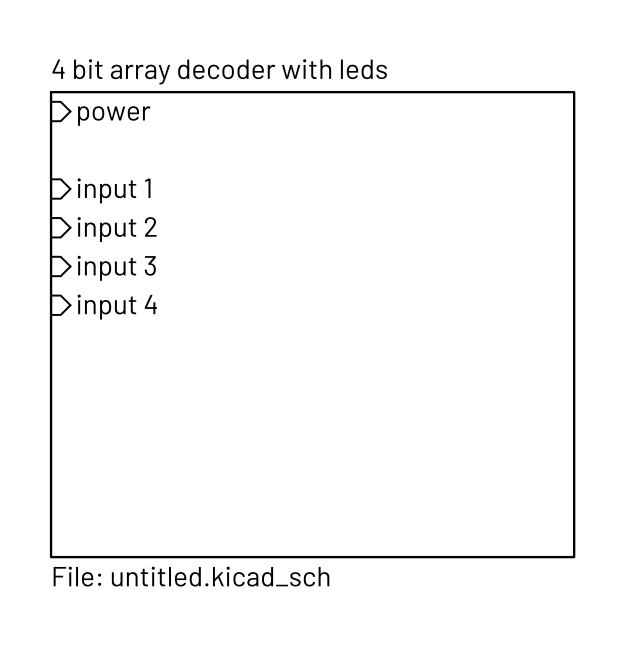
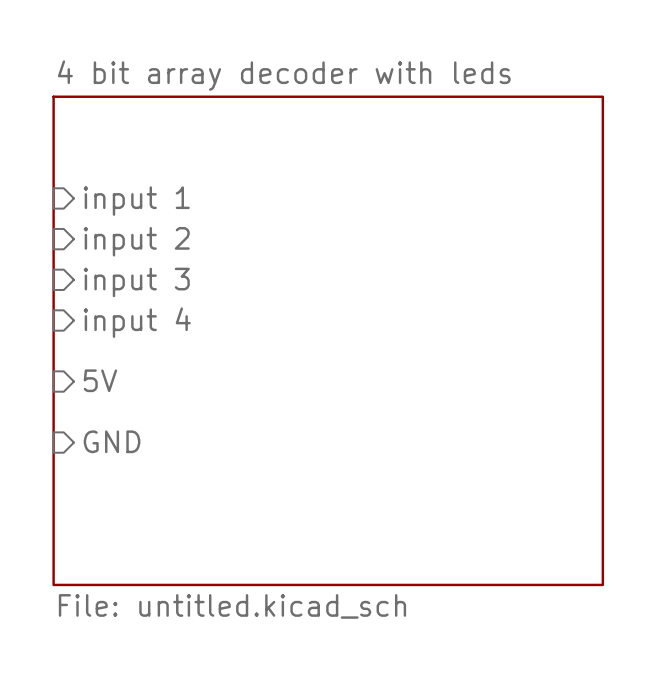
sheet pin: power (114, 116) -> none
sheet pin: none -> 5V (100, 380)
sheet pin: none -> GND (112, 441)

